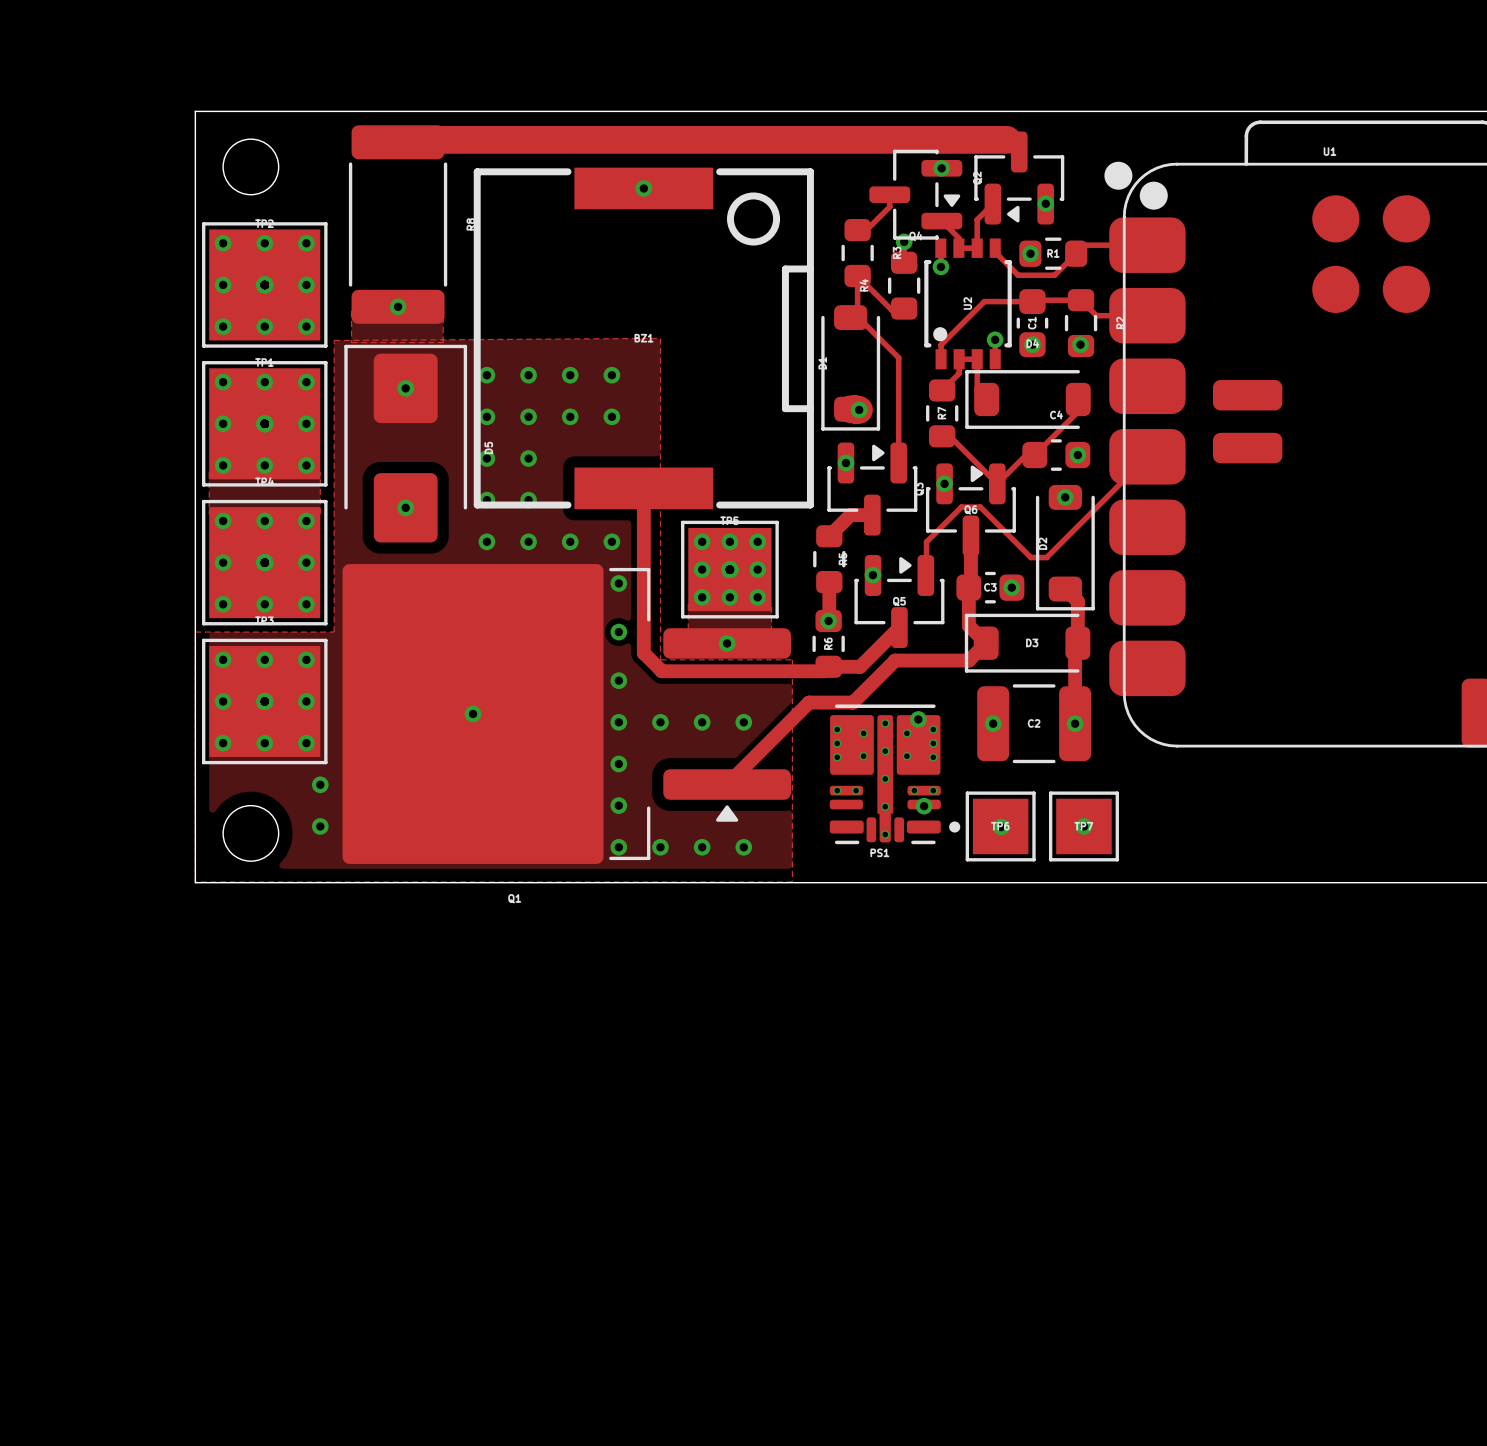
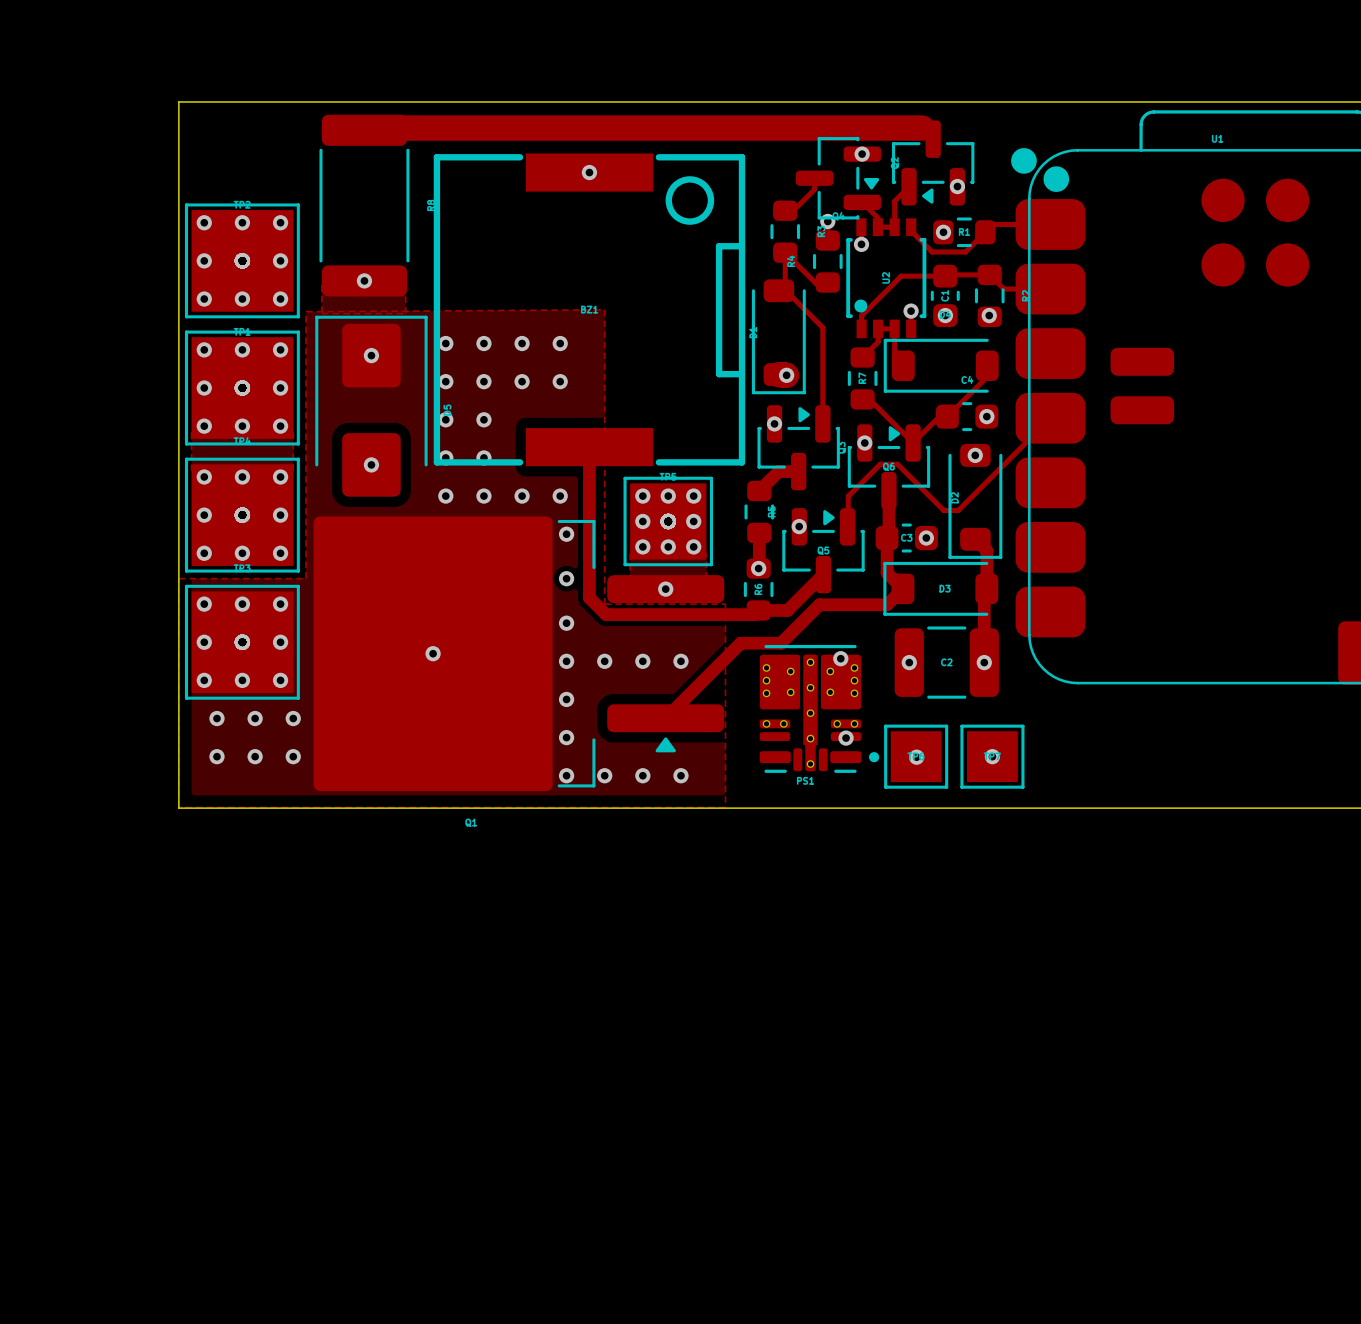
round board edge: [222, 138, 280, 196] -> none
via: none -> (216, 718)
via: none -> (255, 718)
round board edge: [222, 804, 280, 862] -> none
via: none -> (216, 756)
via: none -> (255, 756)

